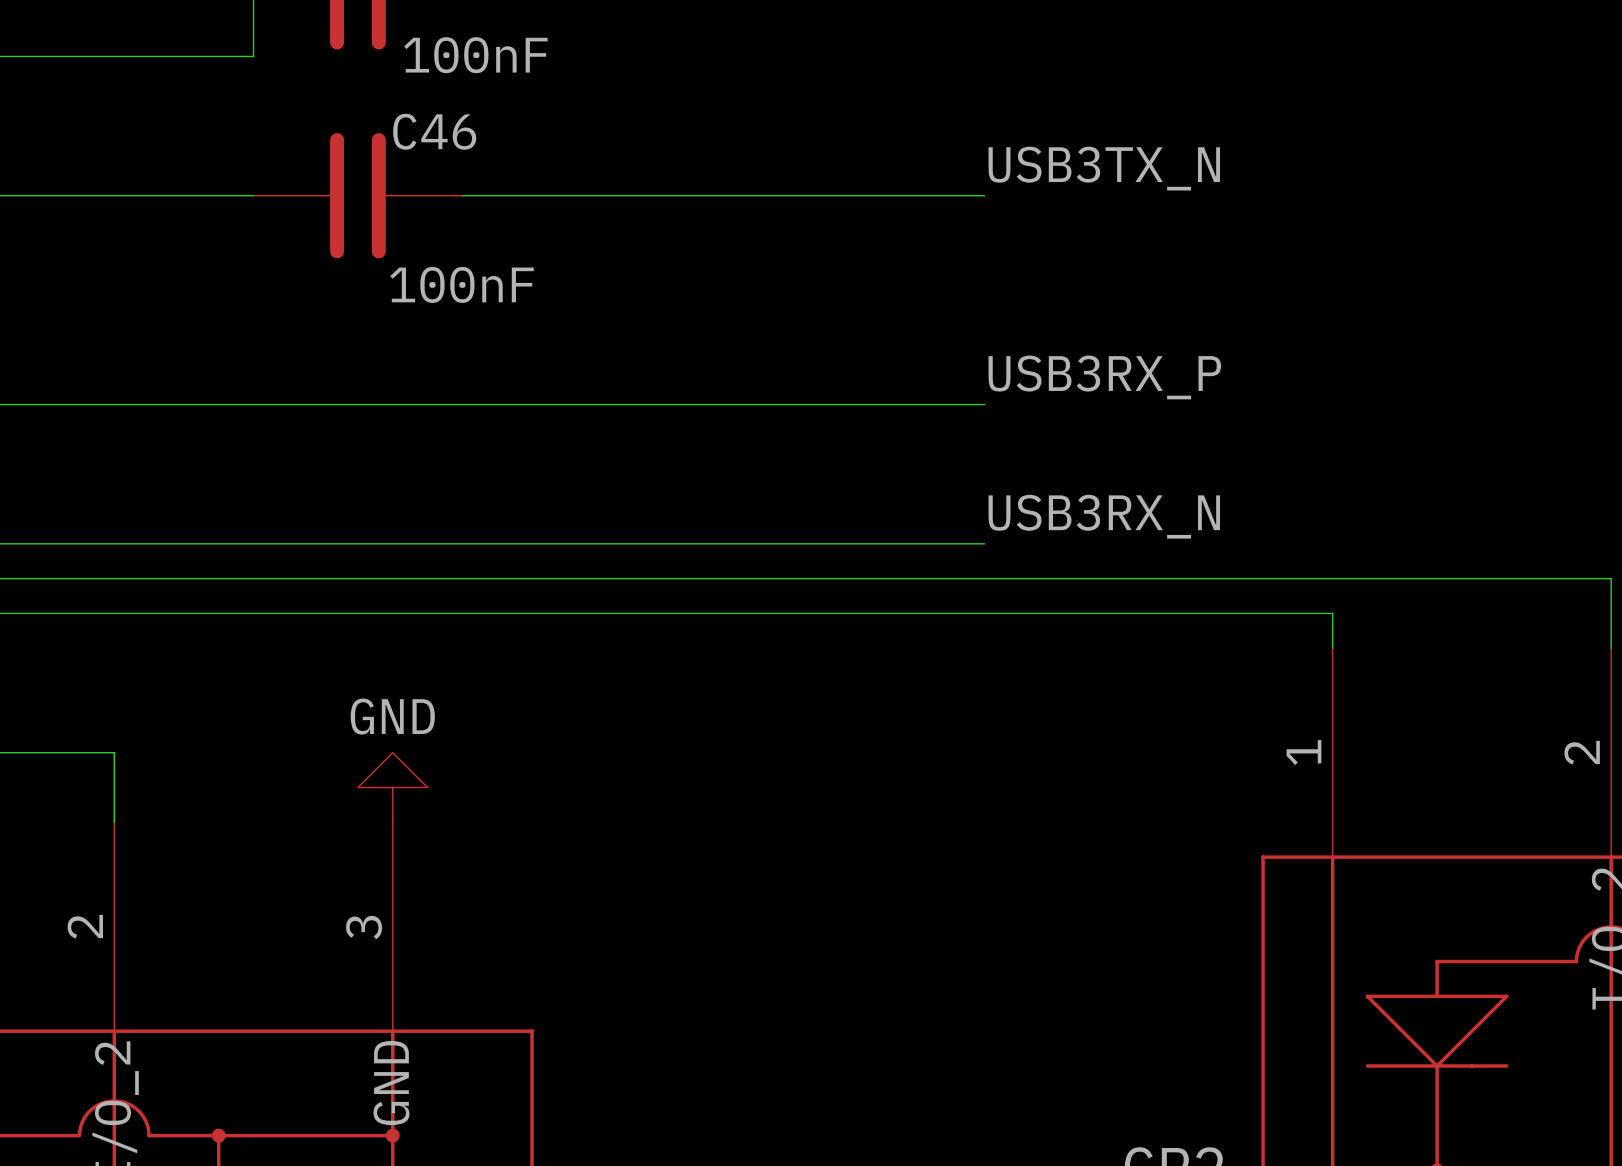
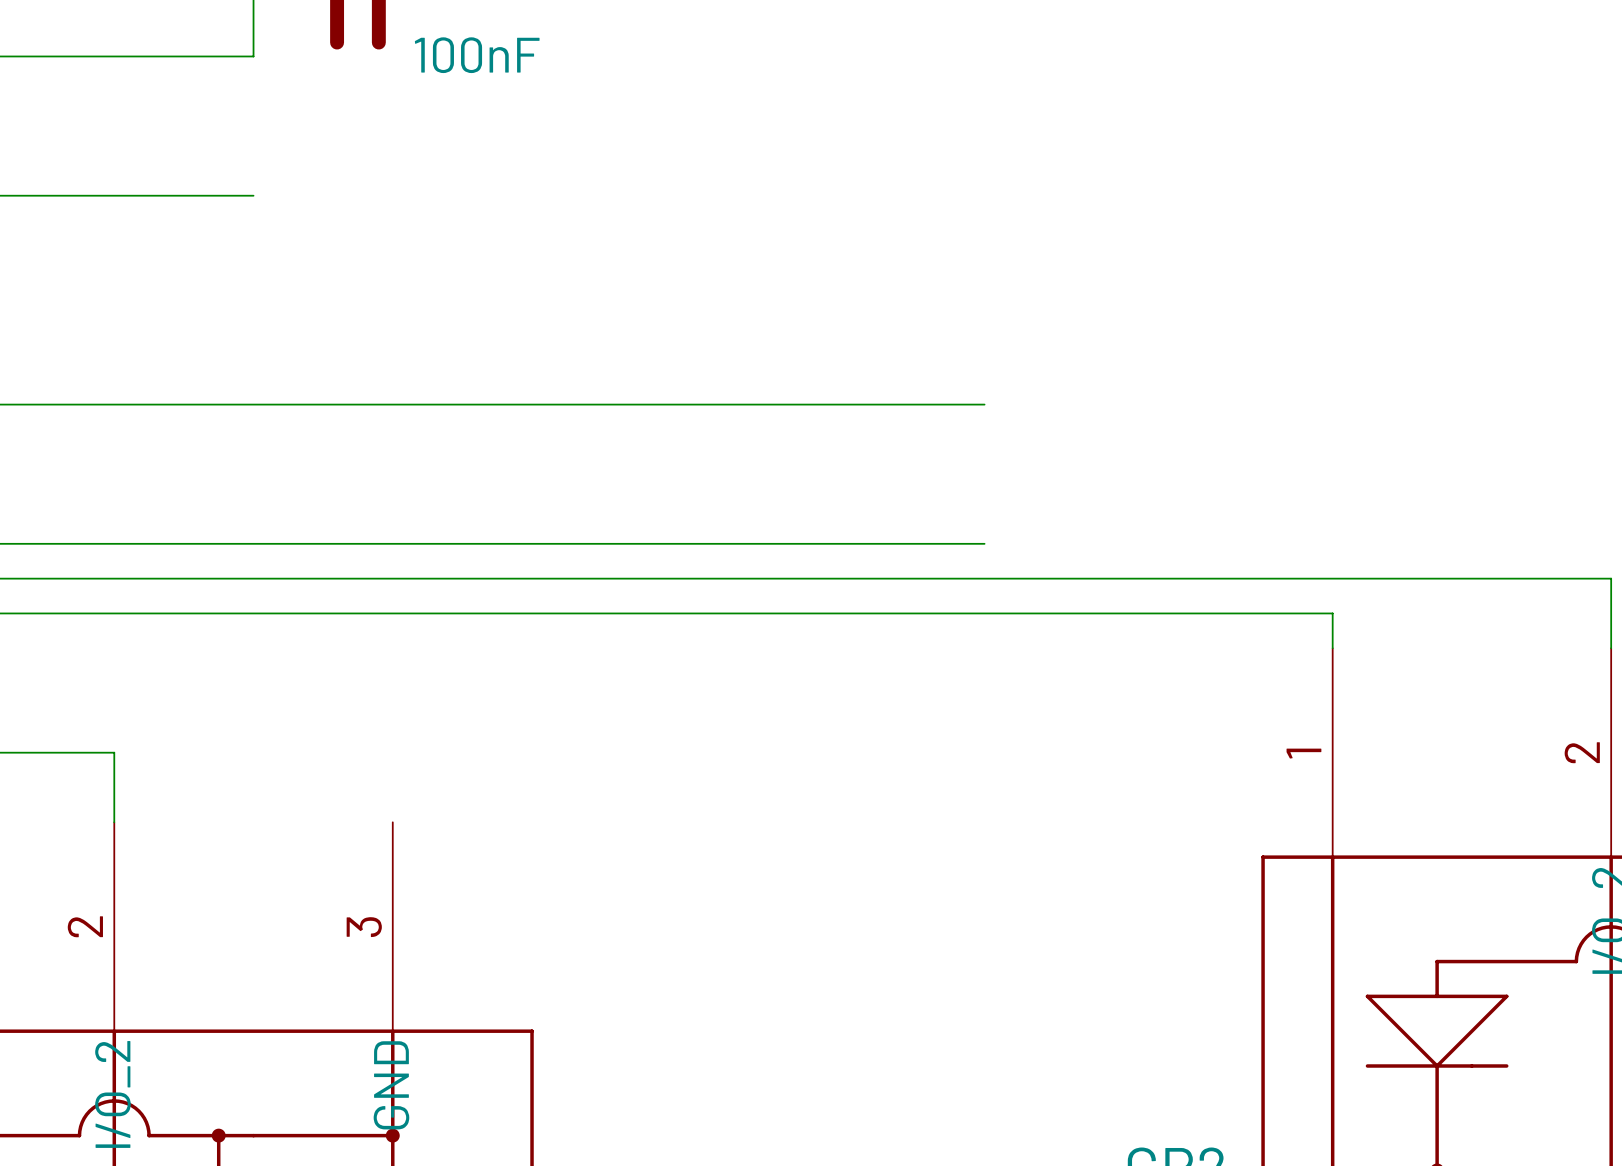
label: USB3TX_N (1104, 168) -> none
C46: 100nF (357, 195) -> none
wire: (462, 195) (984, 195) -> none
label: USB3RX_P (1104, 377) -> none
label: USB3RX_N (1104, 516) -> none
power symbol: GND (392, 787) -> none

